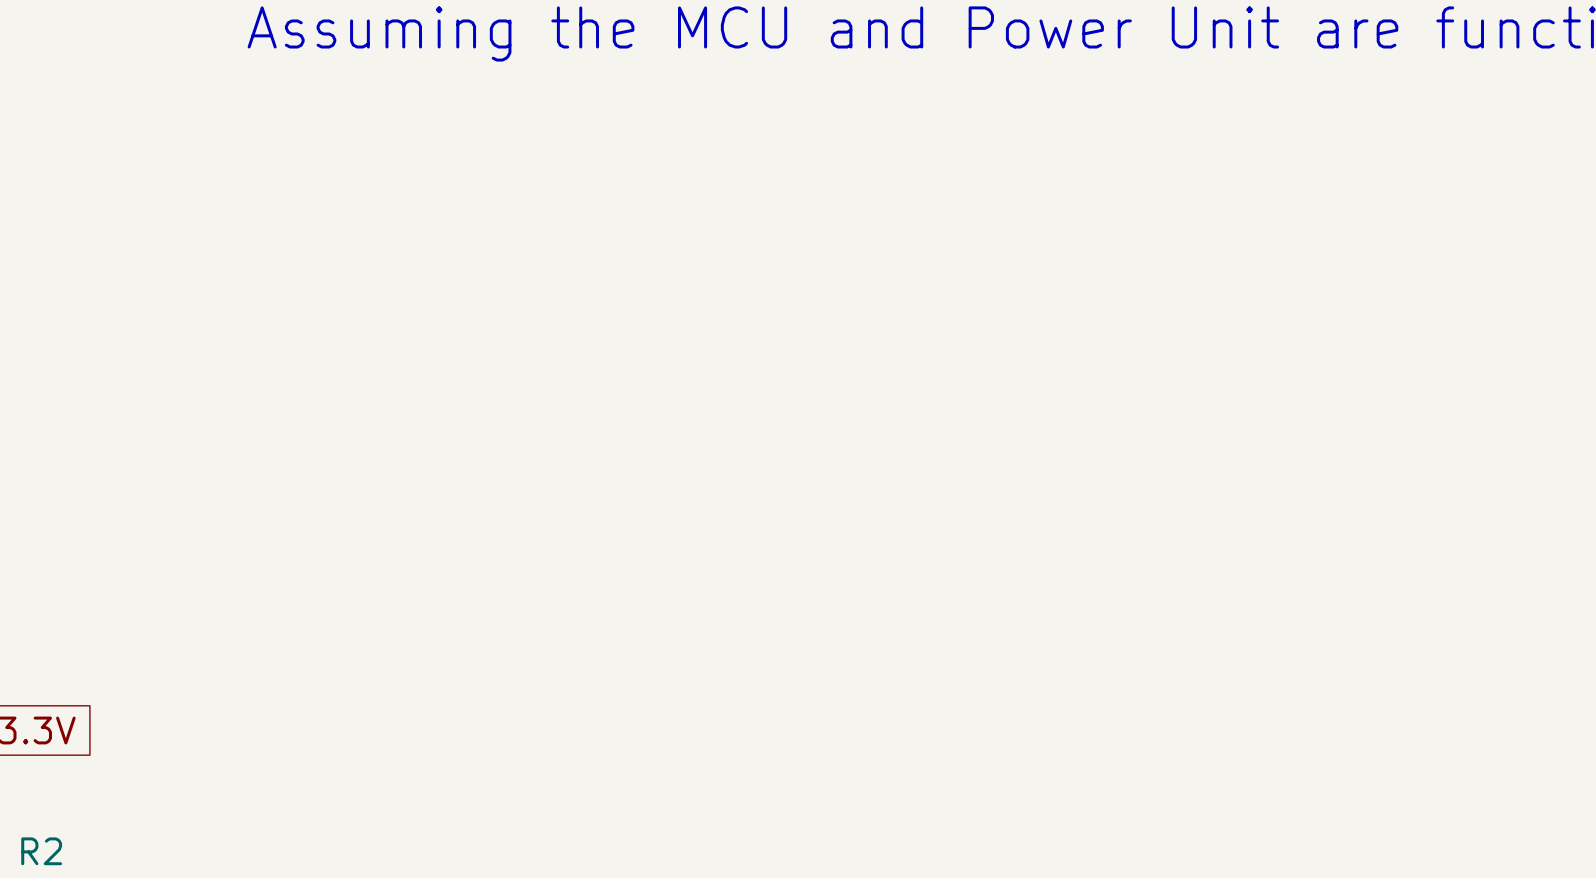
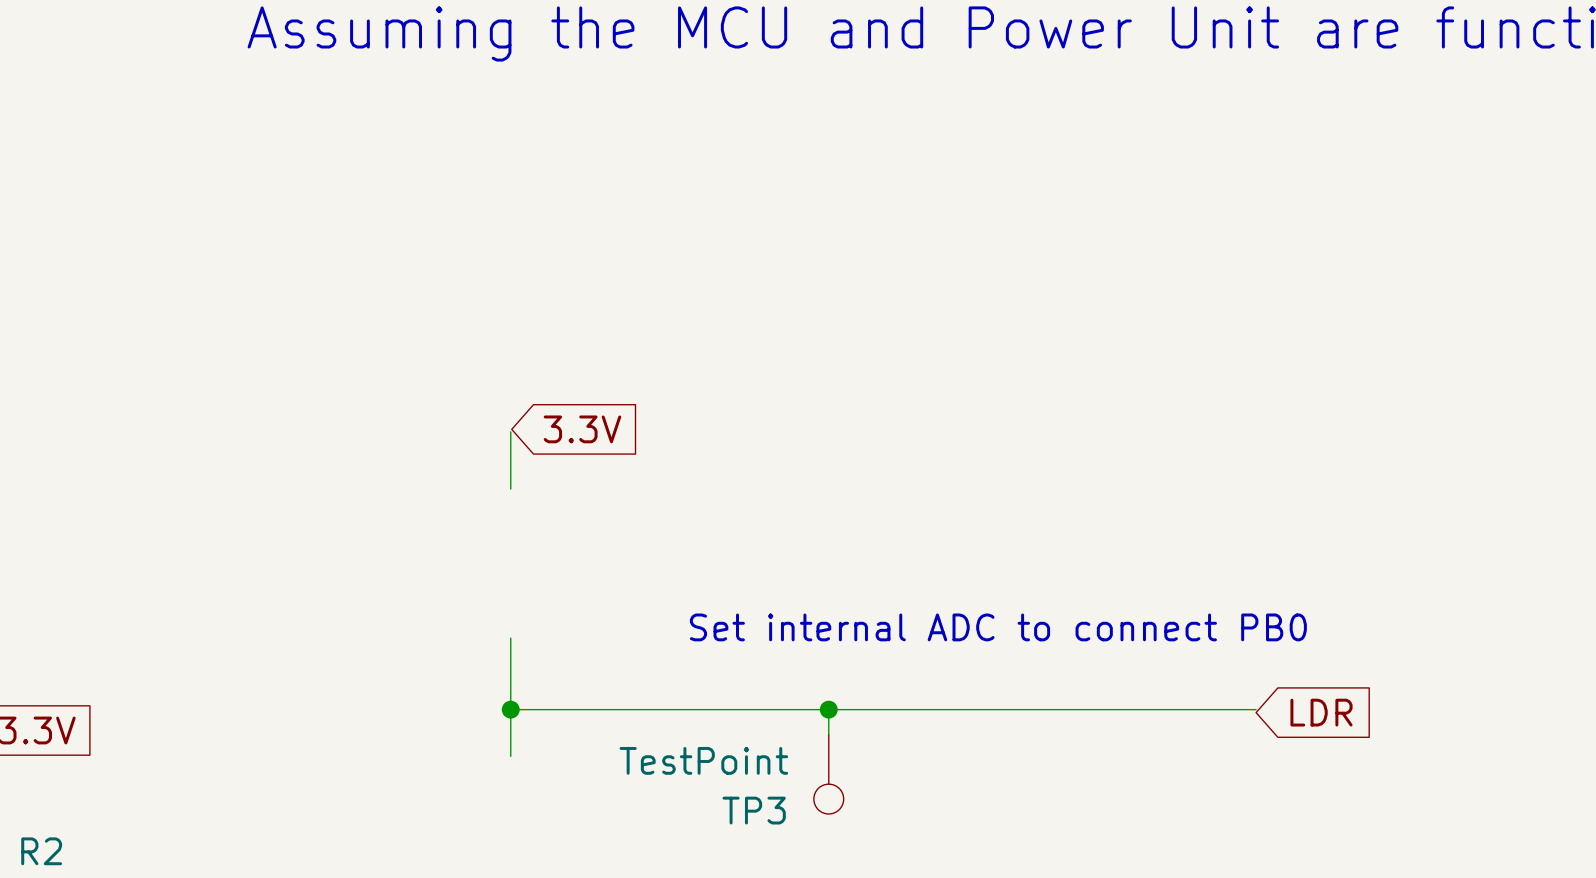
global label: none -> 3.3V (582, 429)
wire: none -> (510, 431) (510, 489)
text: none -> Set internal ADC to connect PB0 (998, 627)
wire: none -> (510, 638) (510, 756)
wire: none -> (510, 709) (1256, 709)
junction: none -> (510, 709)
wire: none -> (828, 709) (828, 734)
junction: none -> (828, 709)
global label: none -> LDR (1321, 712)
TP3: none -> TestPoint (828, 774)

